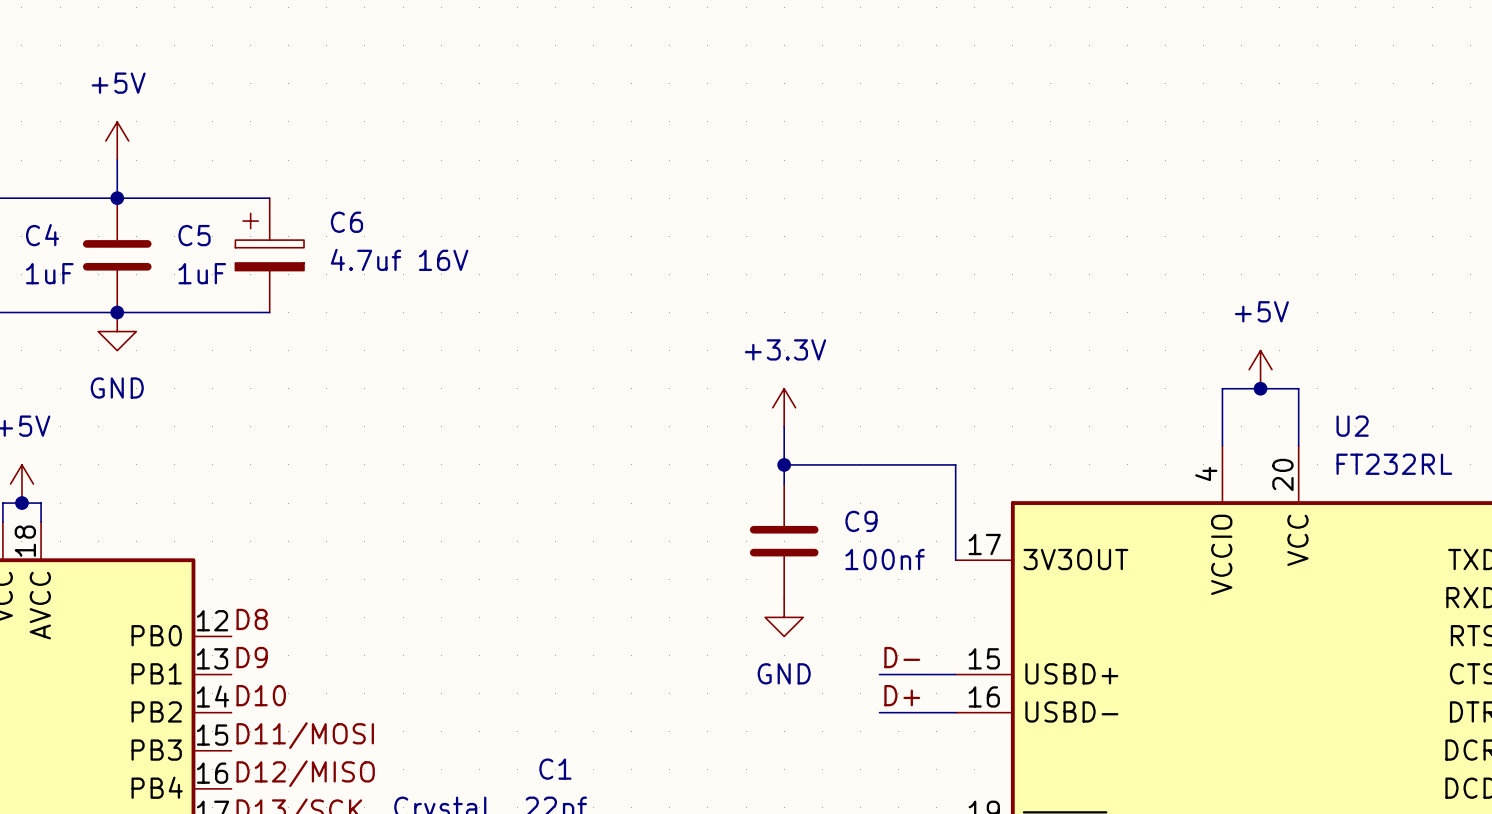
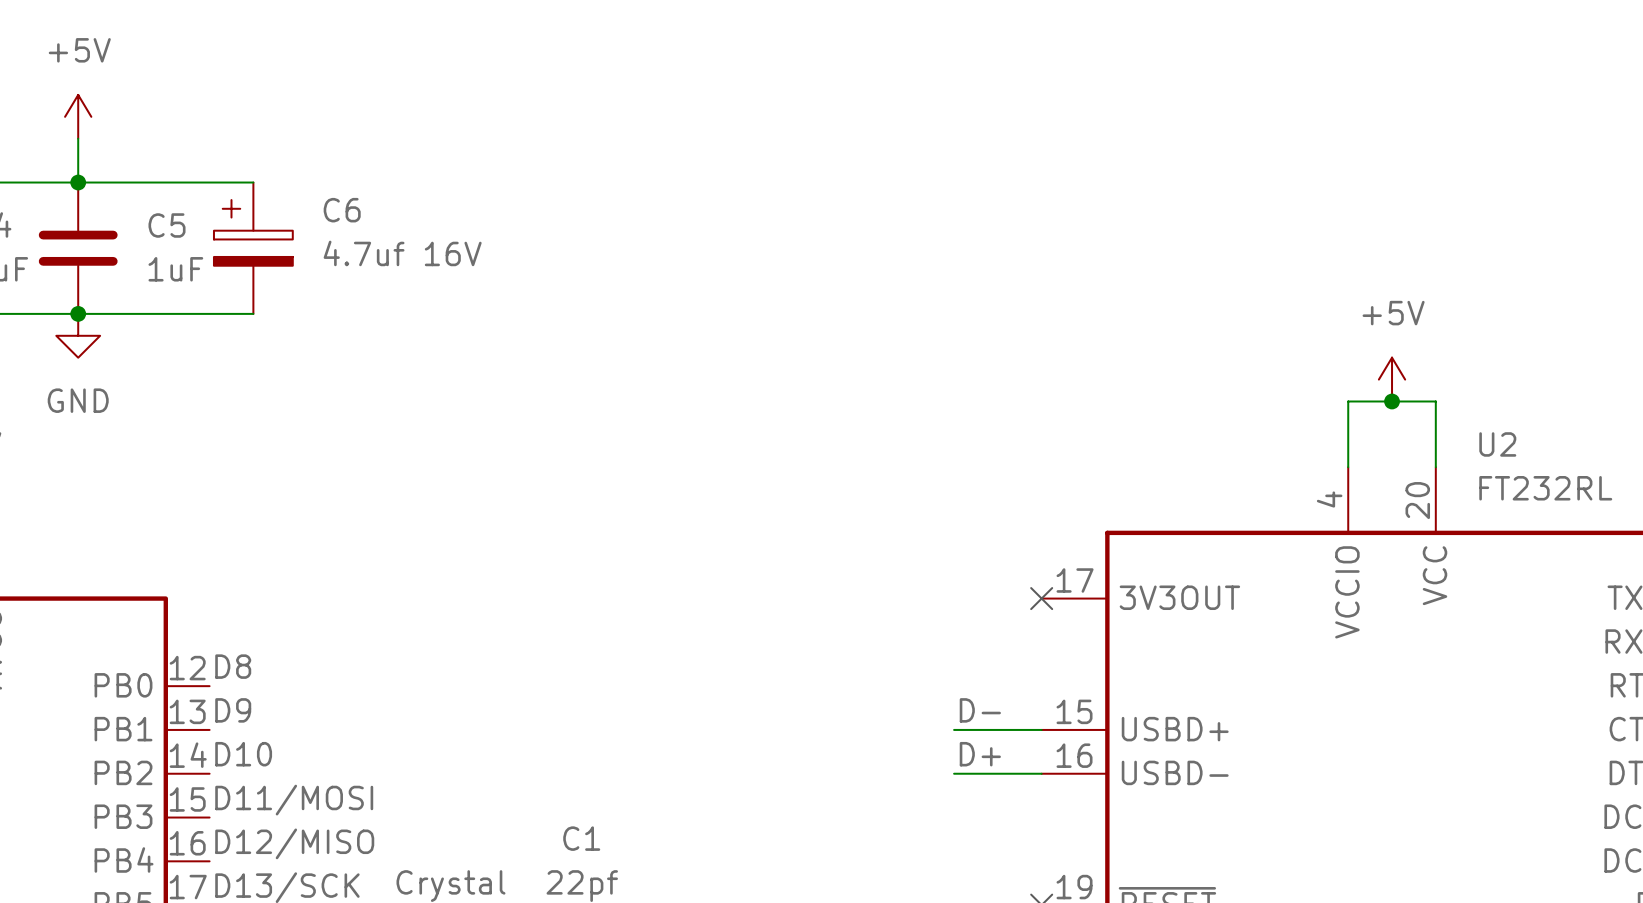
power symbol: +3.3V (784, 407) -> none
wire: (784, 426) (784, 484) -> none
wire: (784, 464) (955, 464) (955, 560) -> none
junction: (784, 464) -> none
C9: 100nf (784, 541) -> none
no-connect mark: none -> (1041, 598)
power symbol: GND (784, 617) -> none

